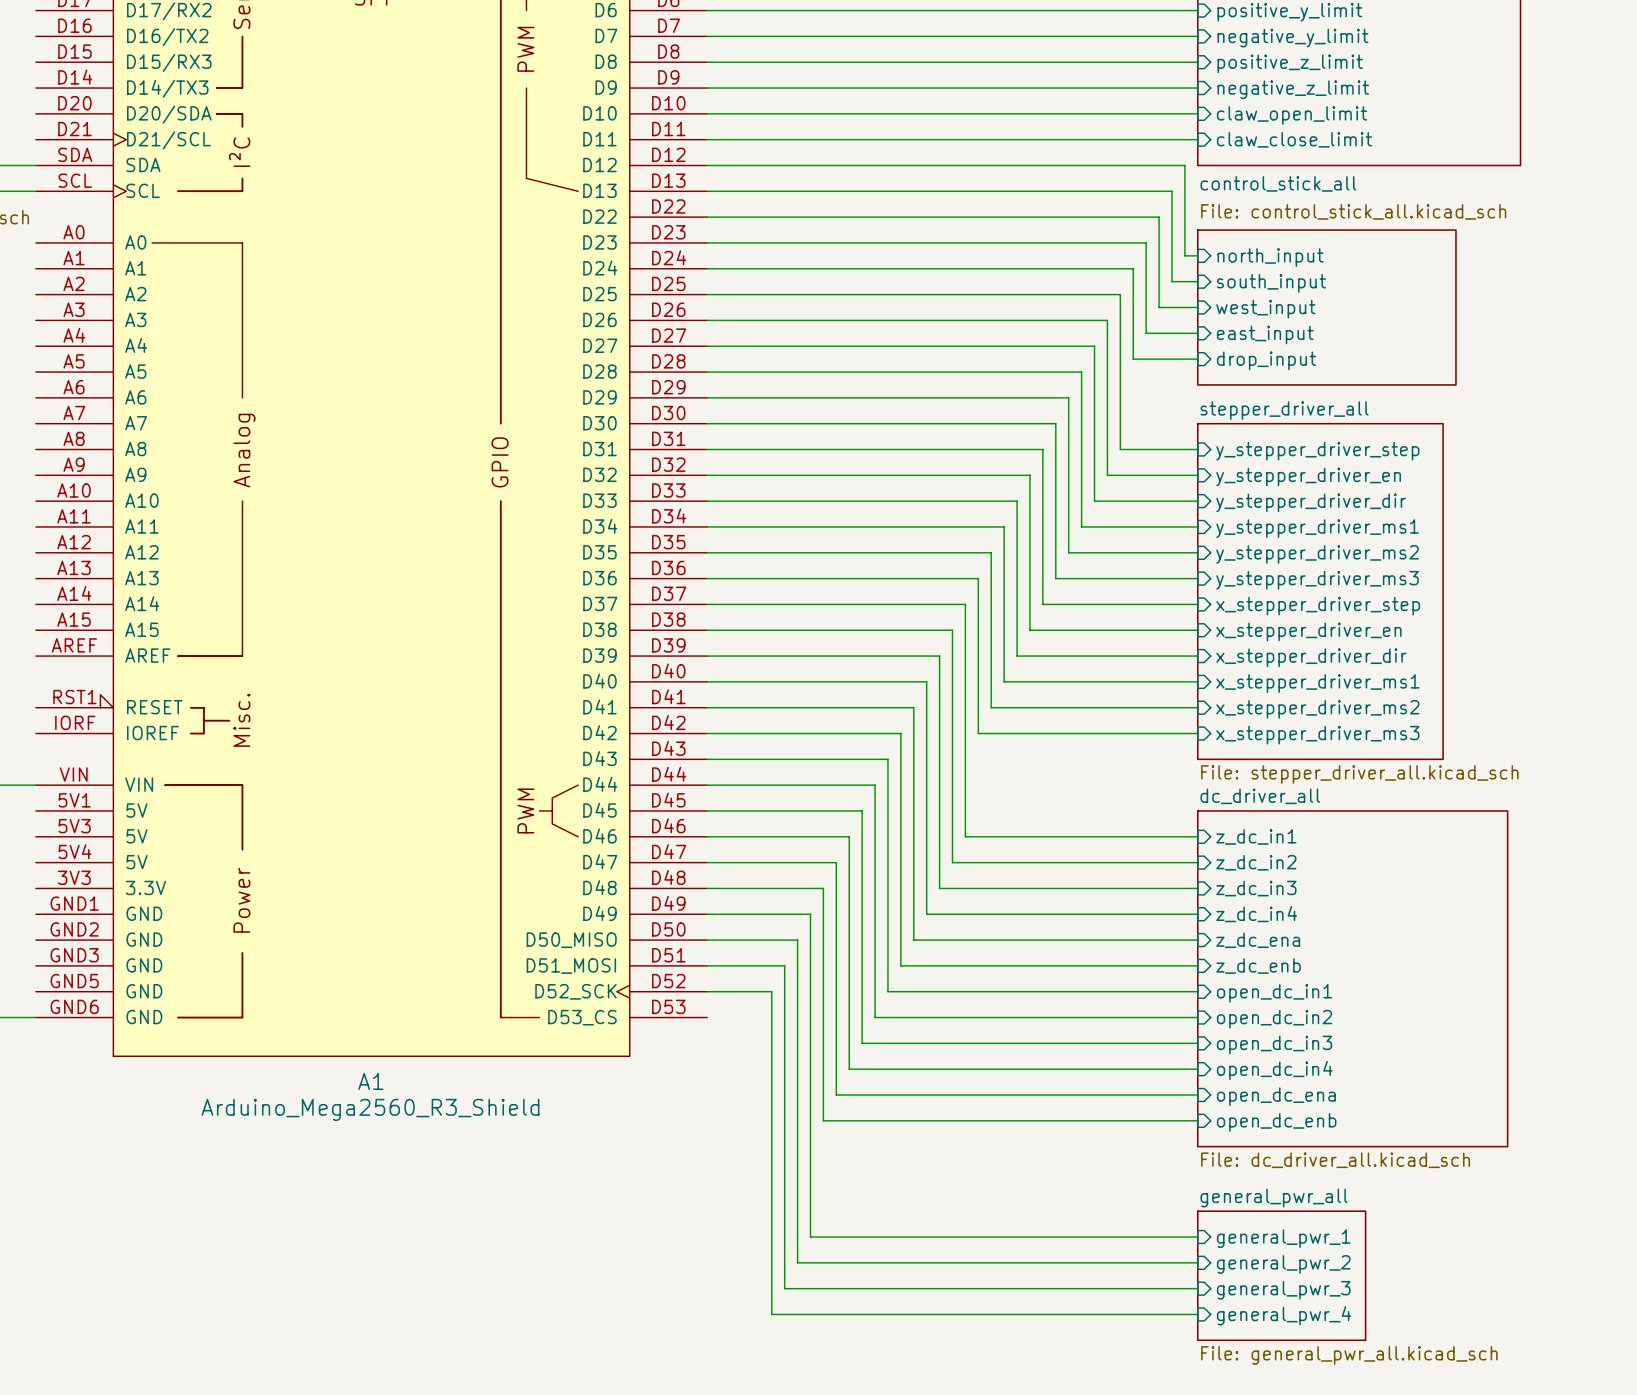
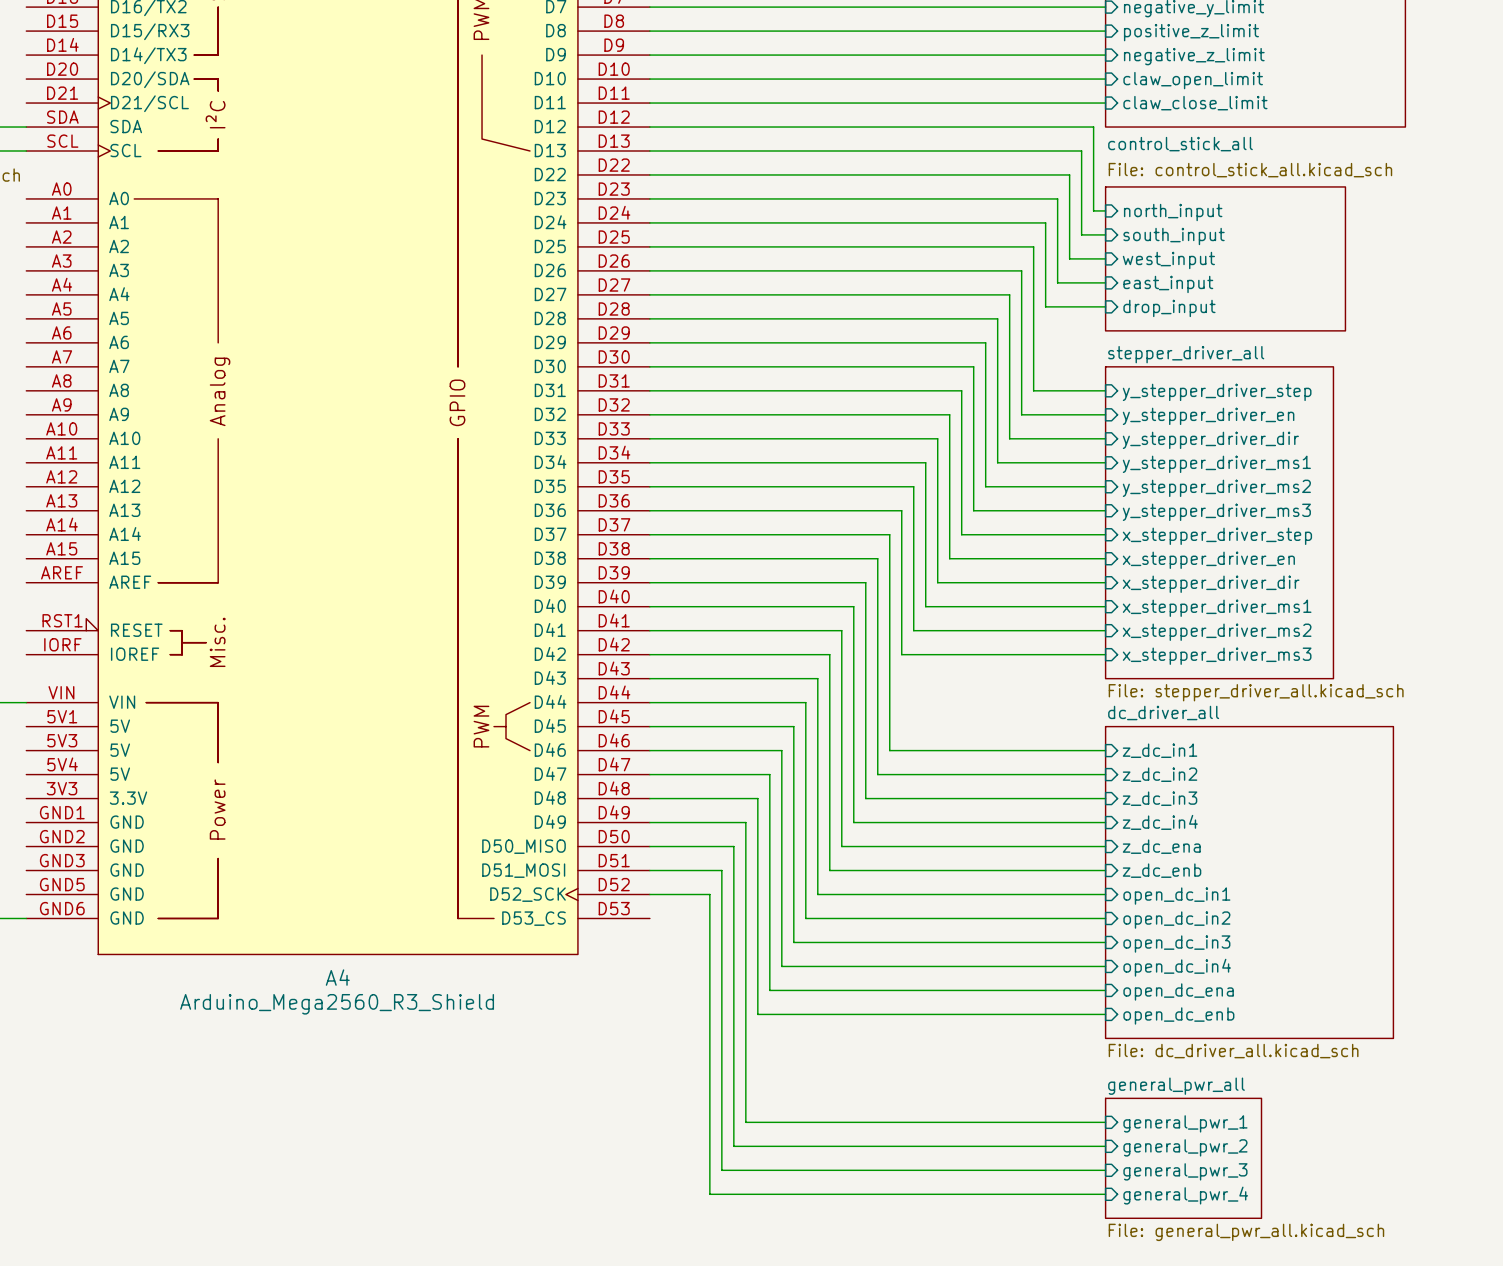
A1 name: A1 (370, 1081) -> A4 (337, 977)

